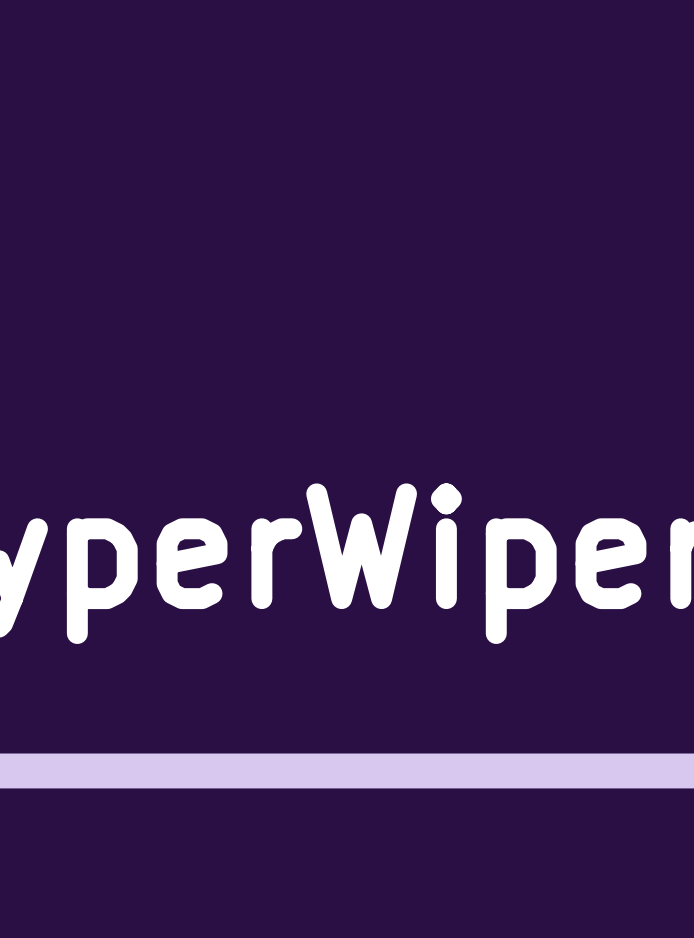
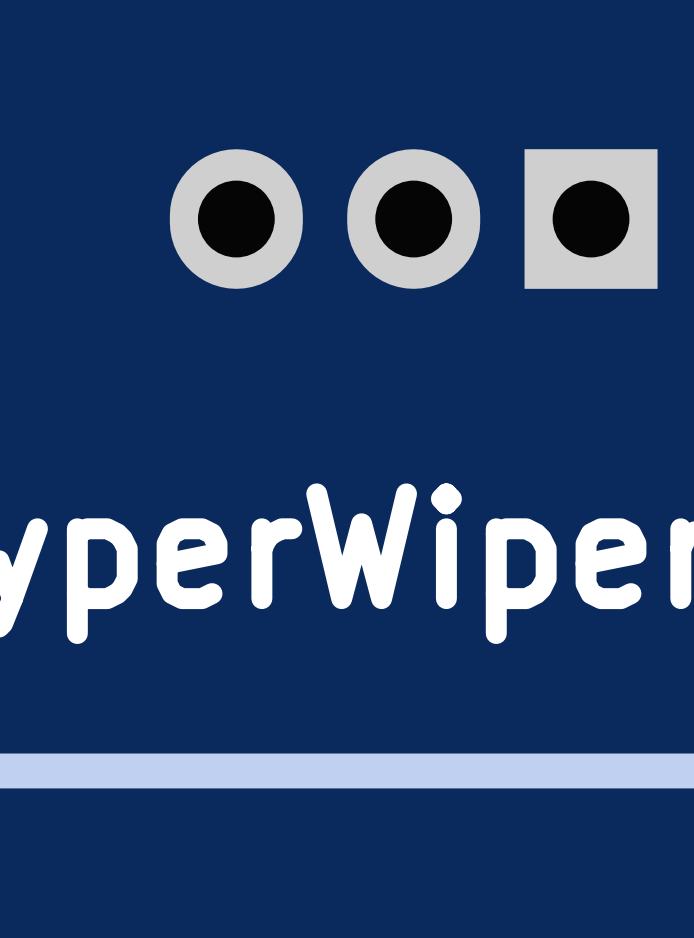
part: none -> (413, 219)

